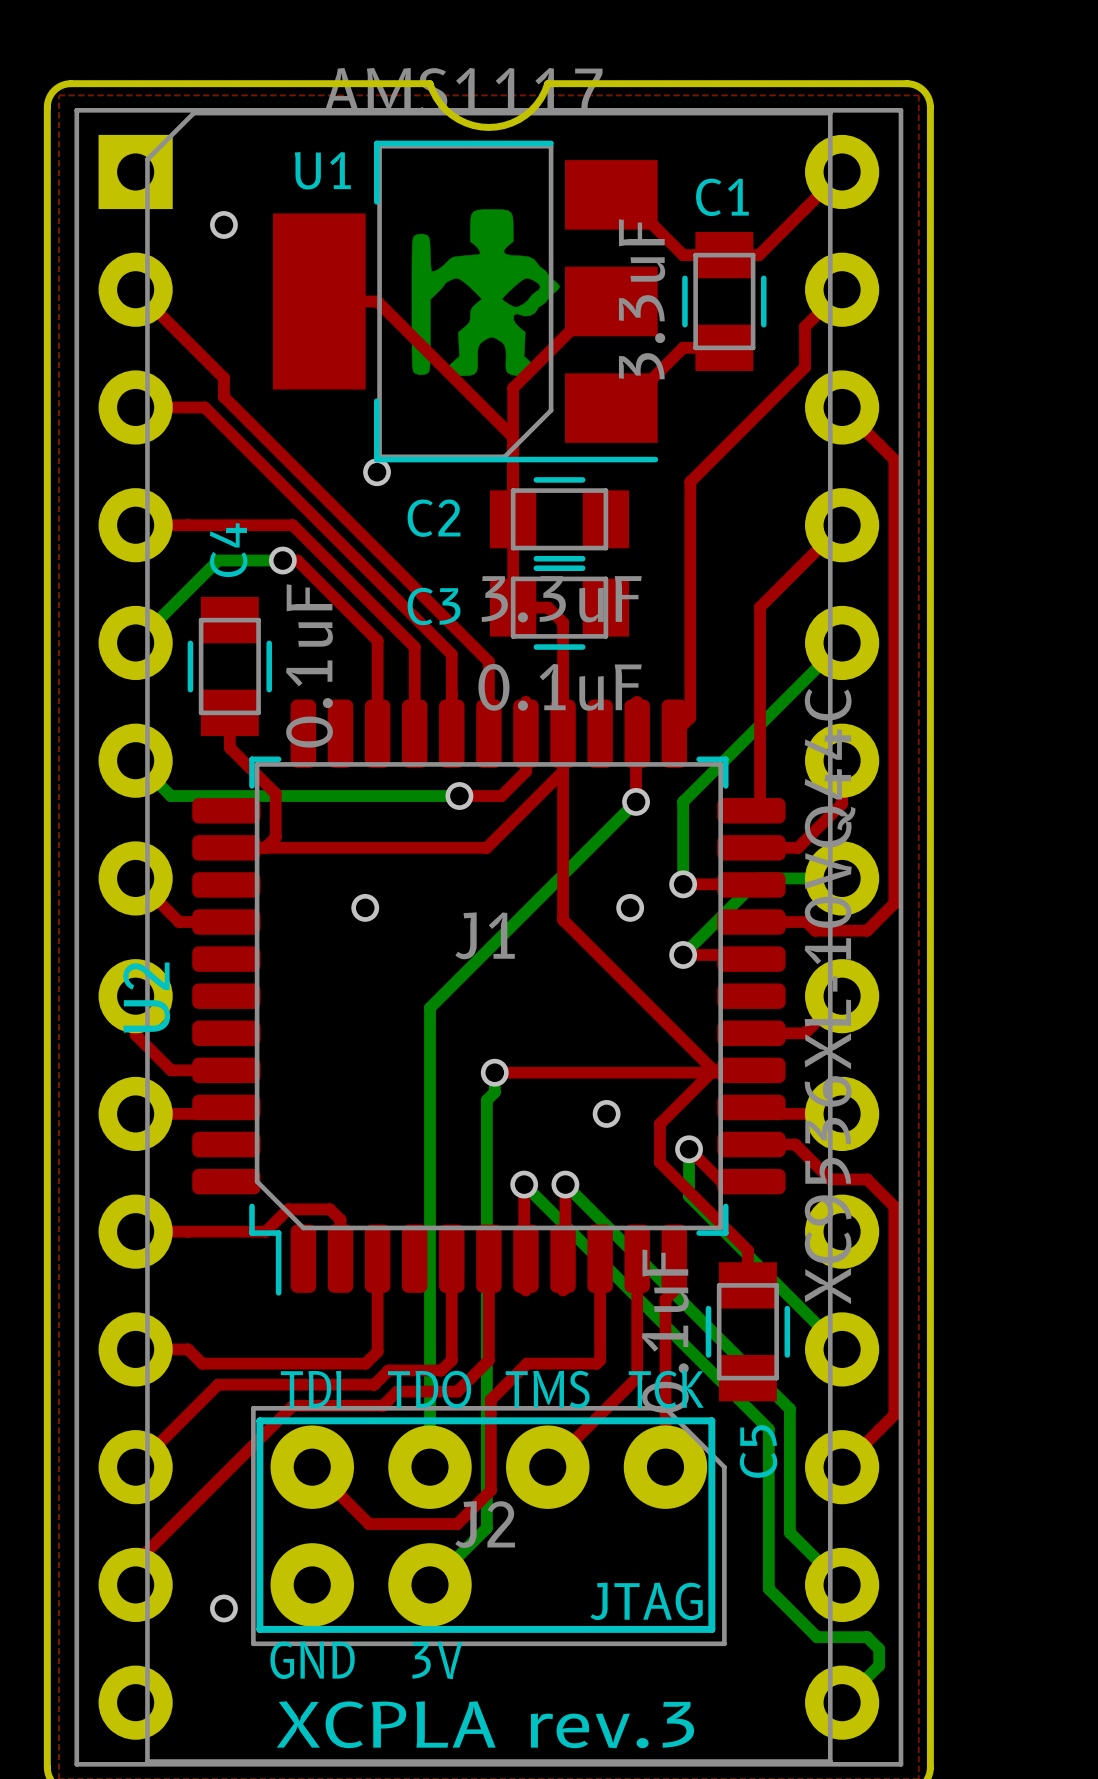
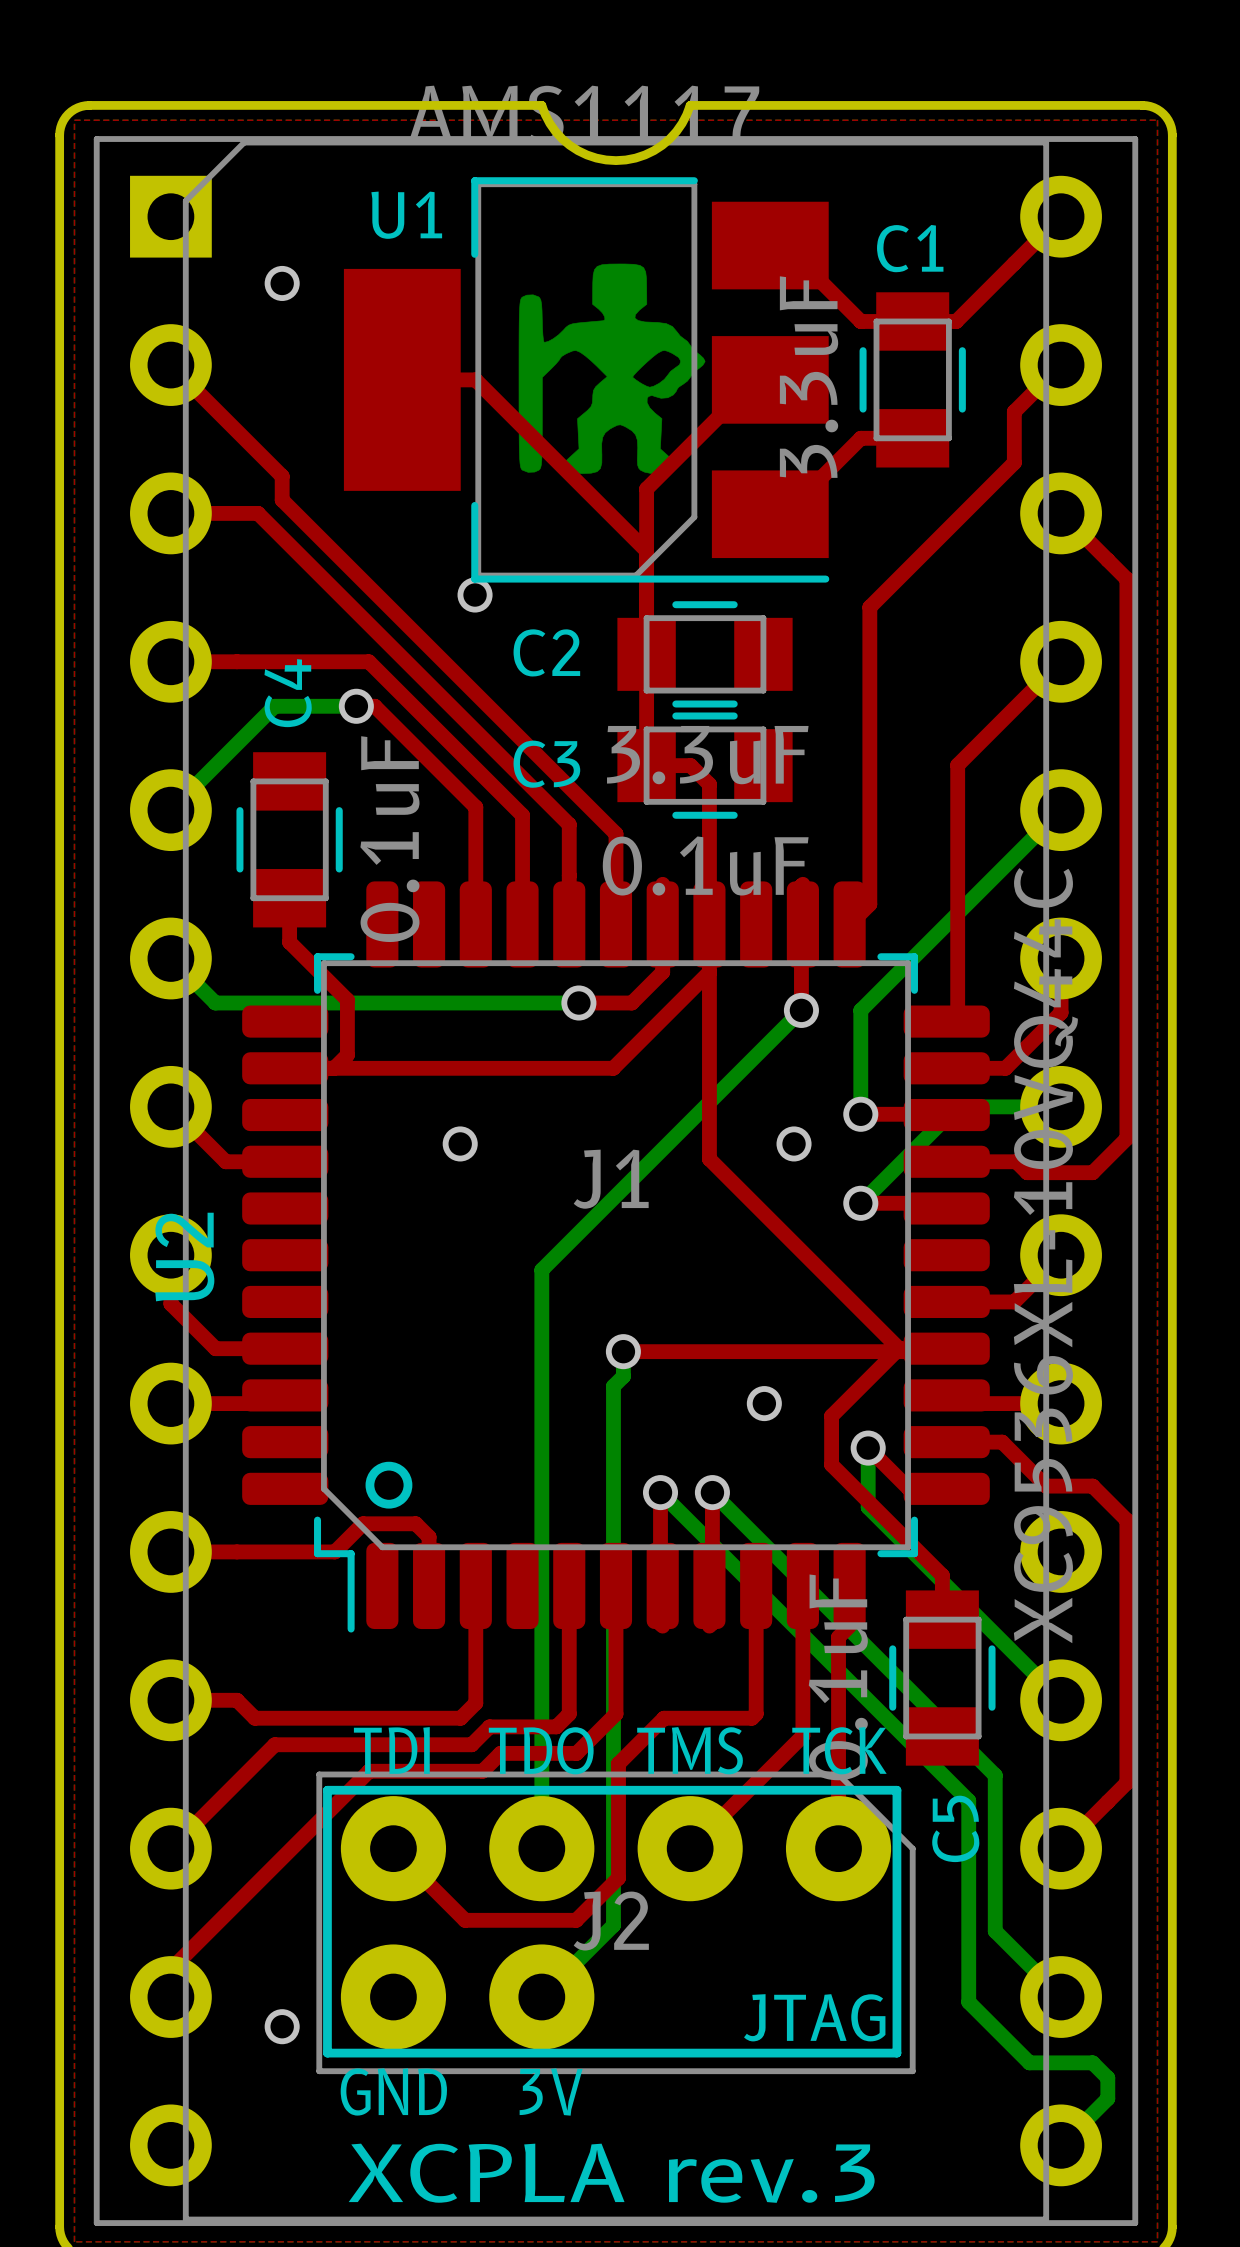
J1 footprint: [74, 108, 904, 1767] -> [93, 136, 1139, 2226]
drawing: none -> [365, 1461, 413, 1509]

